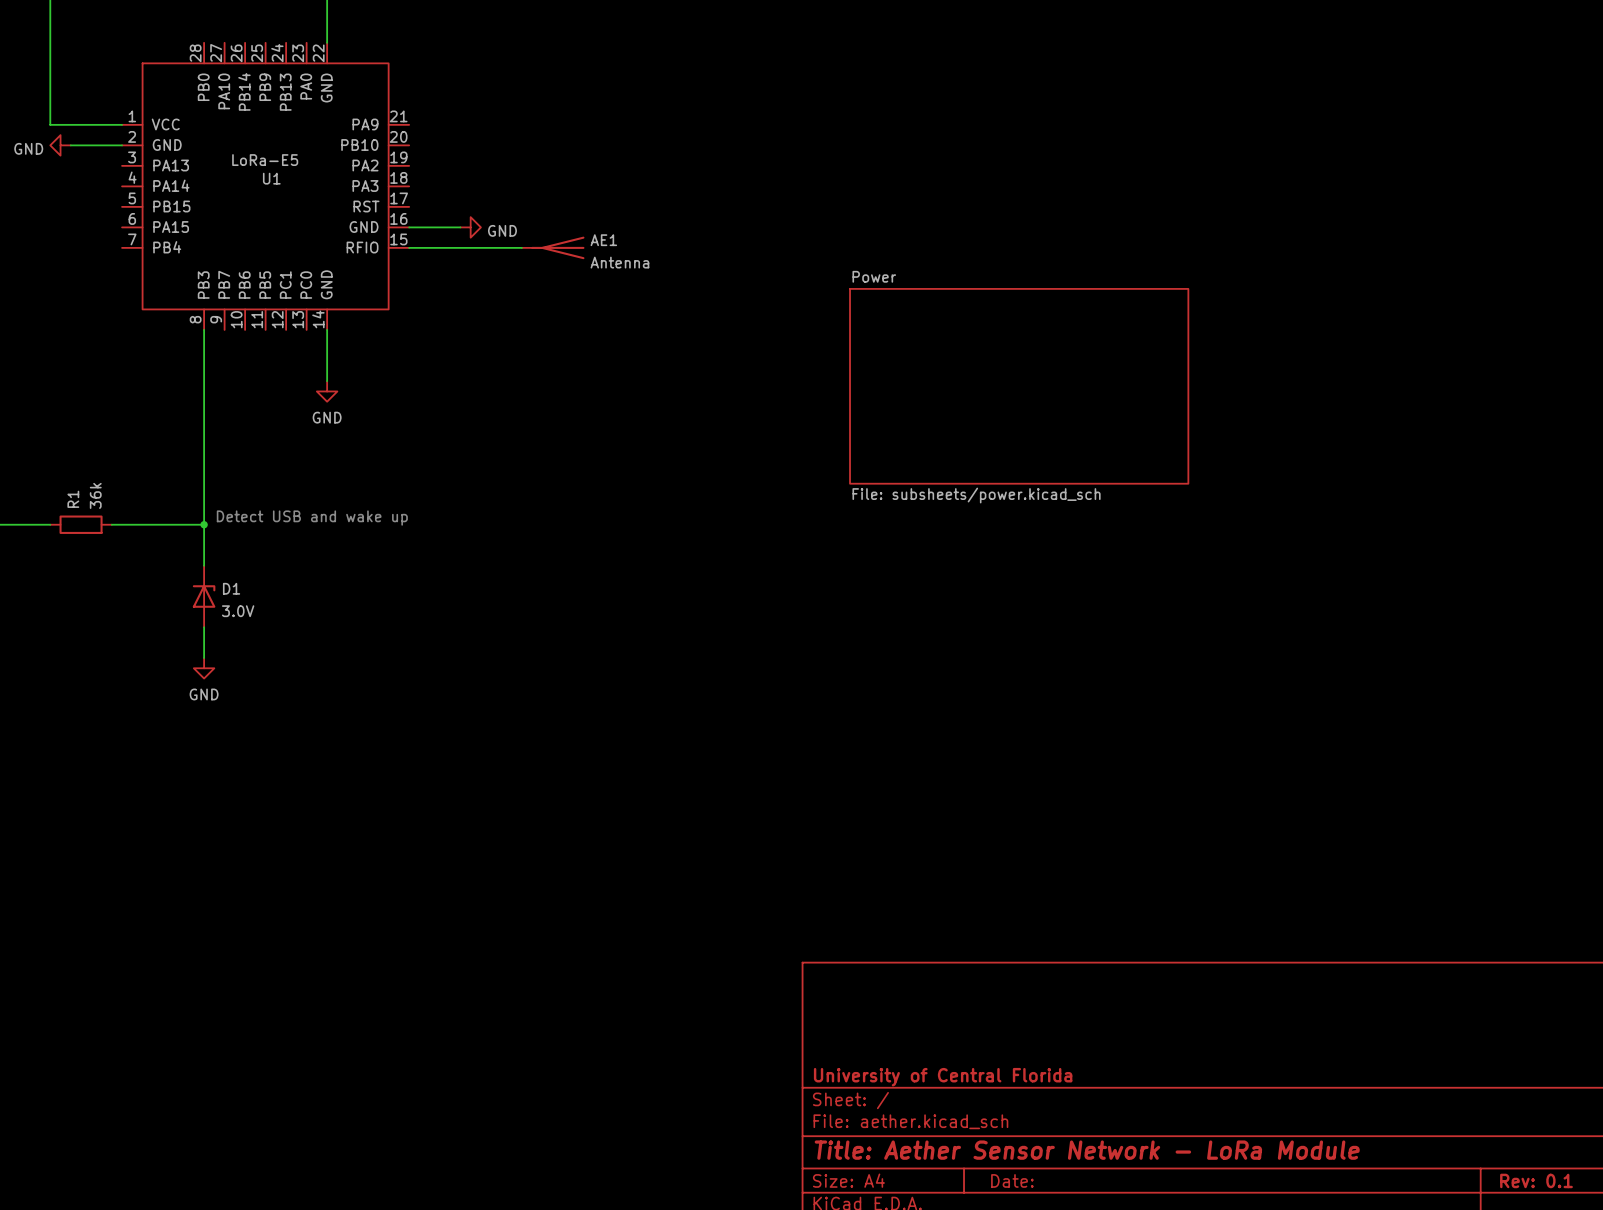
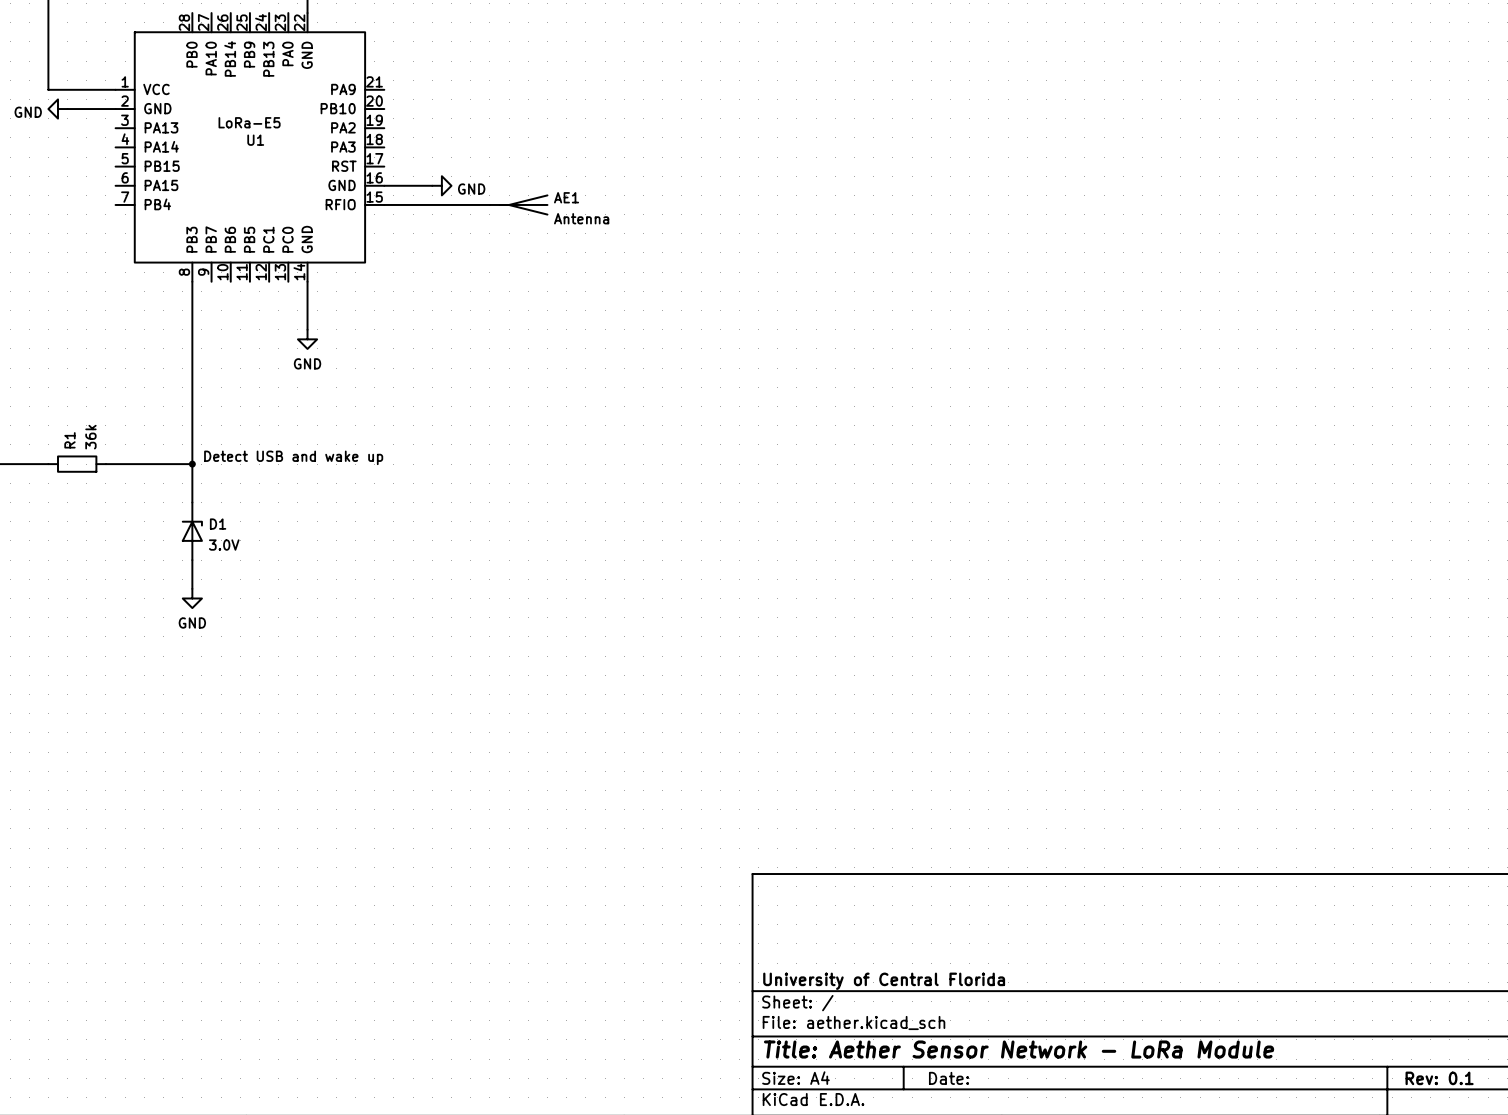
sheet Power: File: subsheets/power.kicad_sch (1019, 386) -> none

